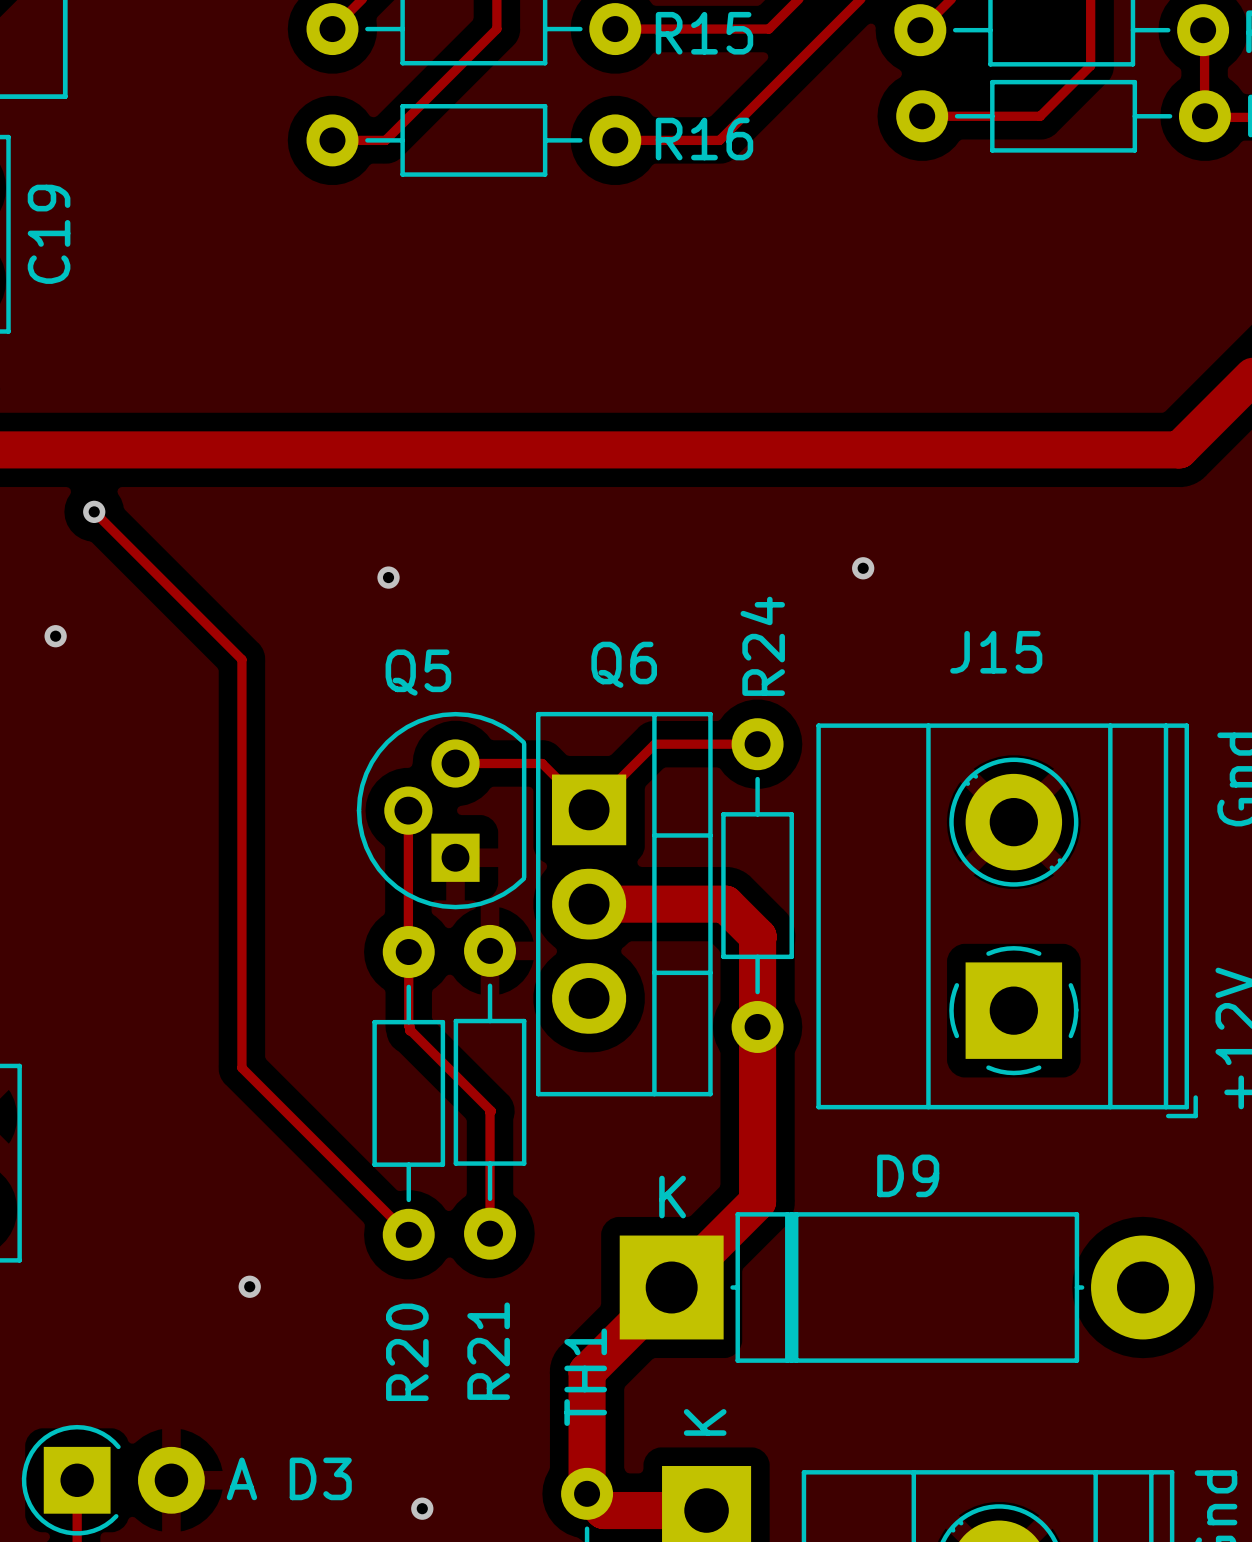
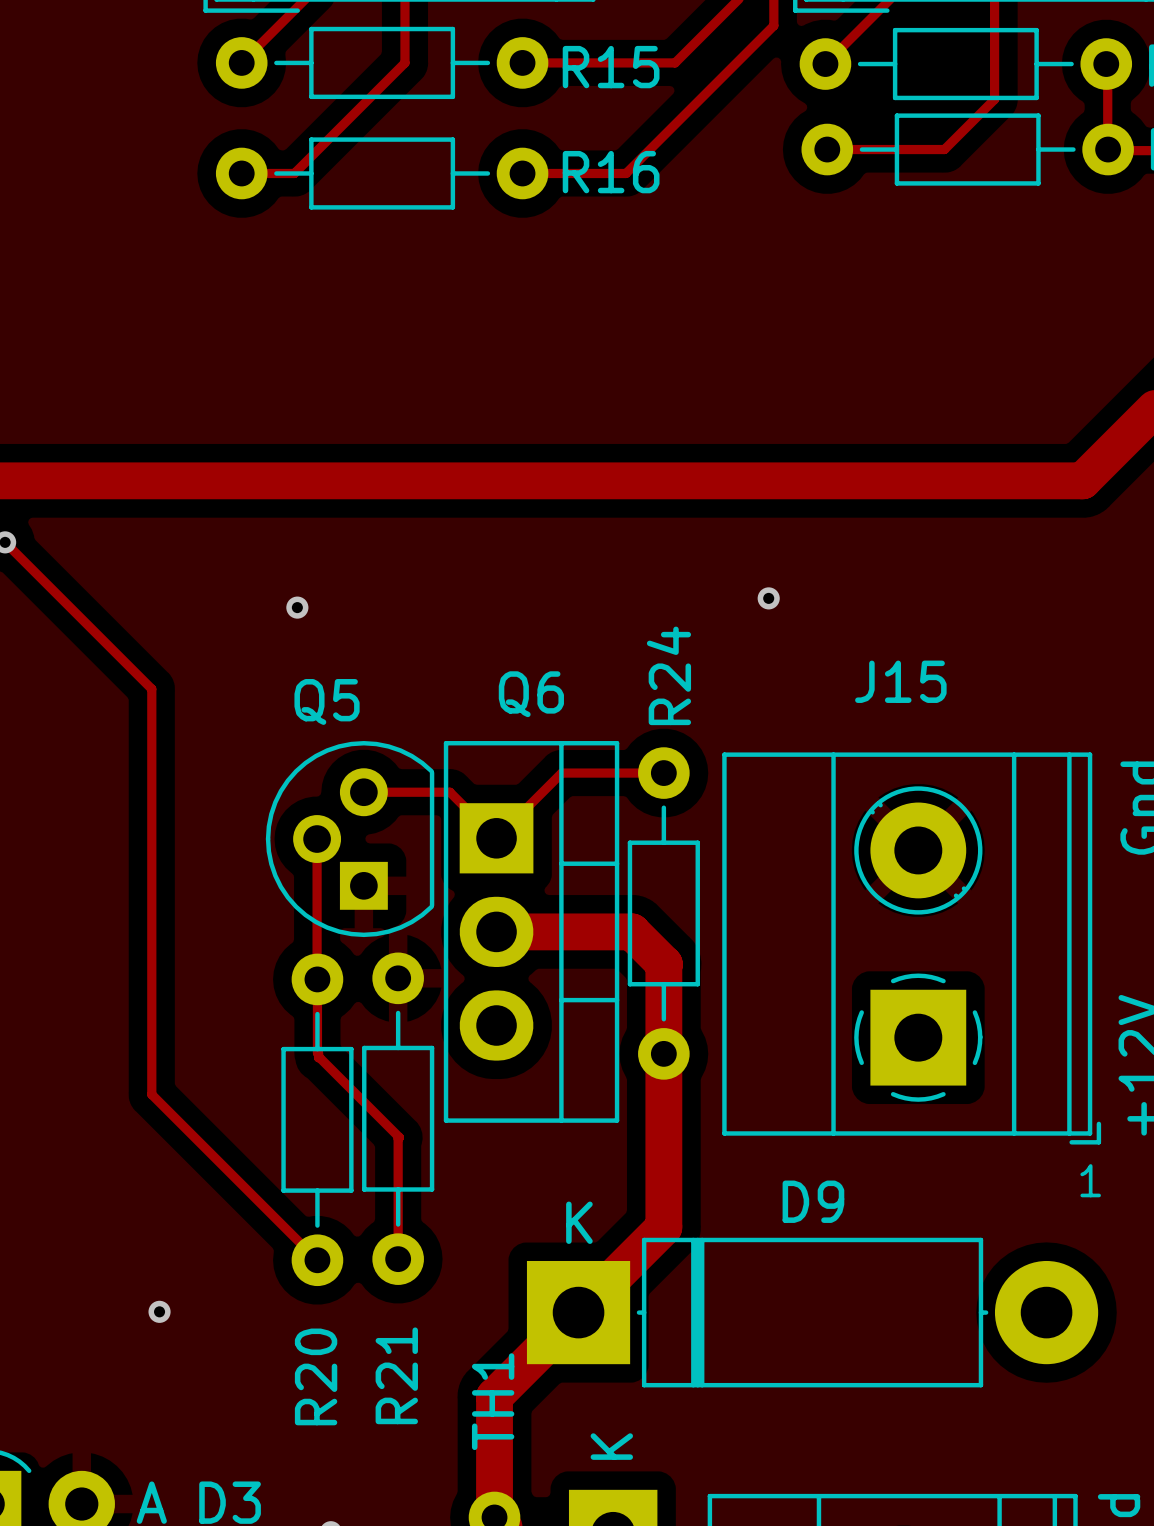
text: none -> 1 (1090, 1180)

